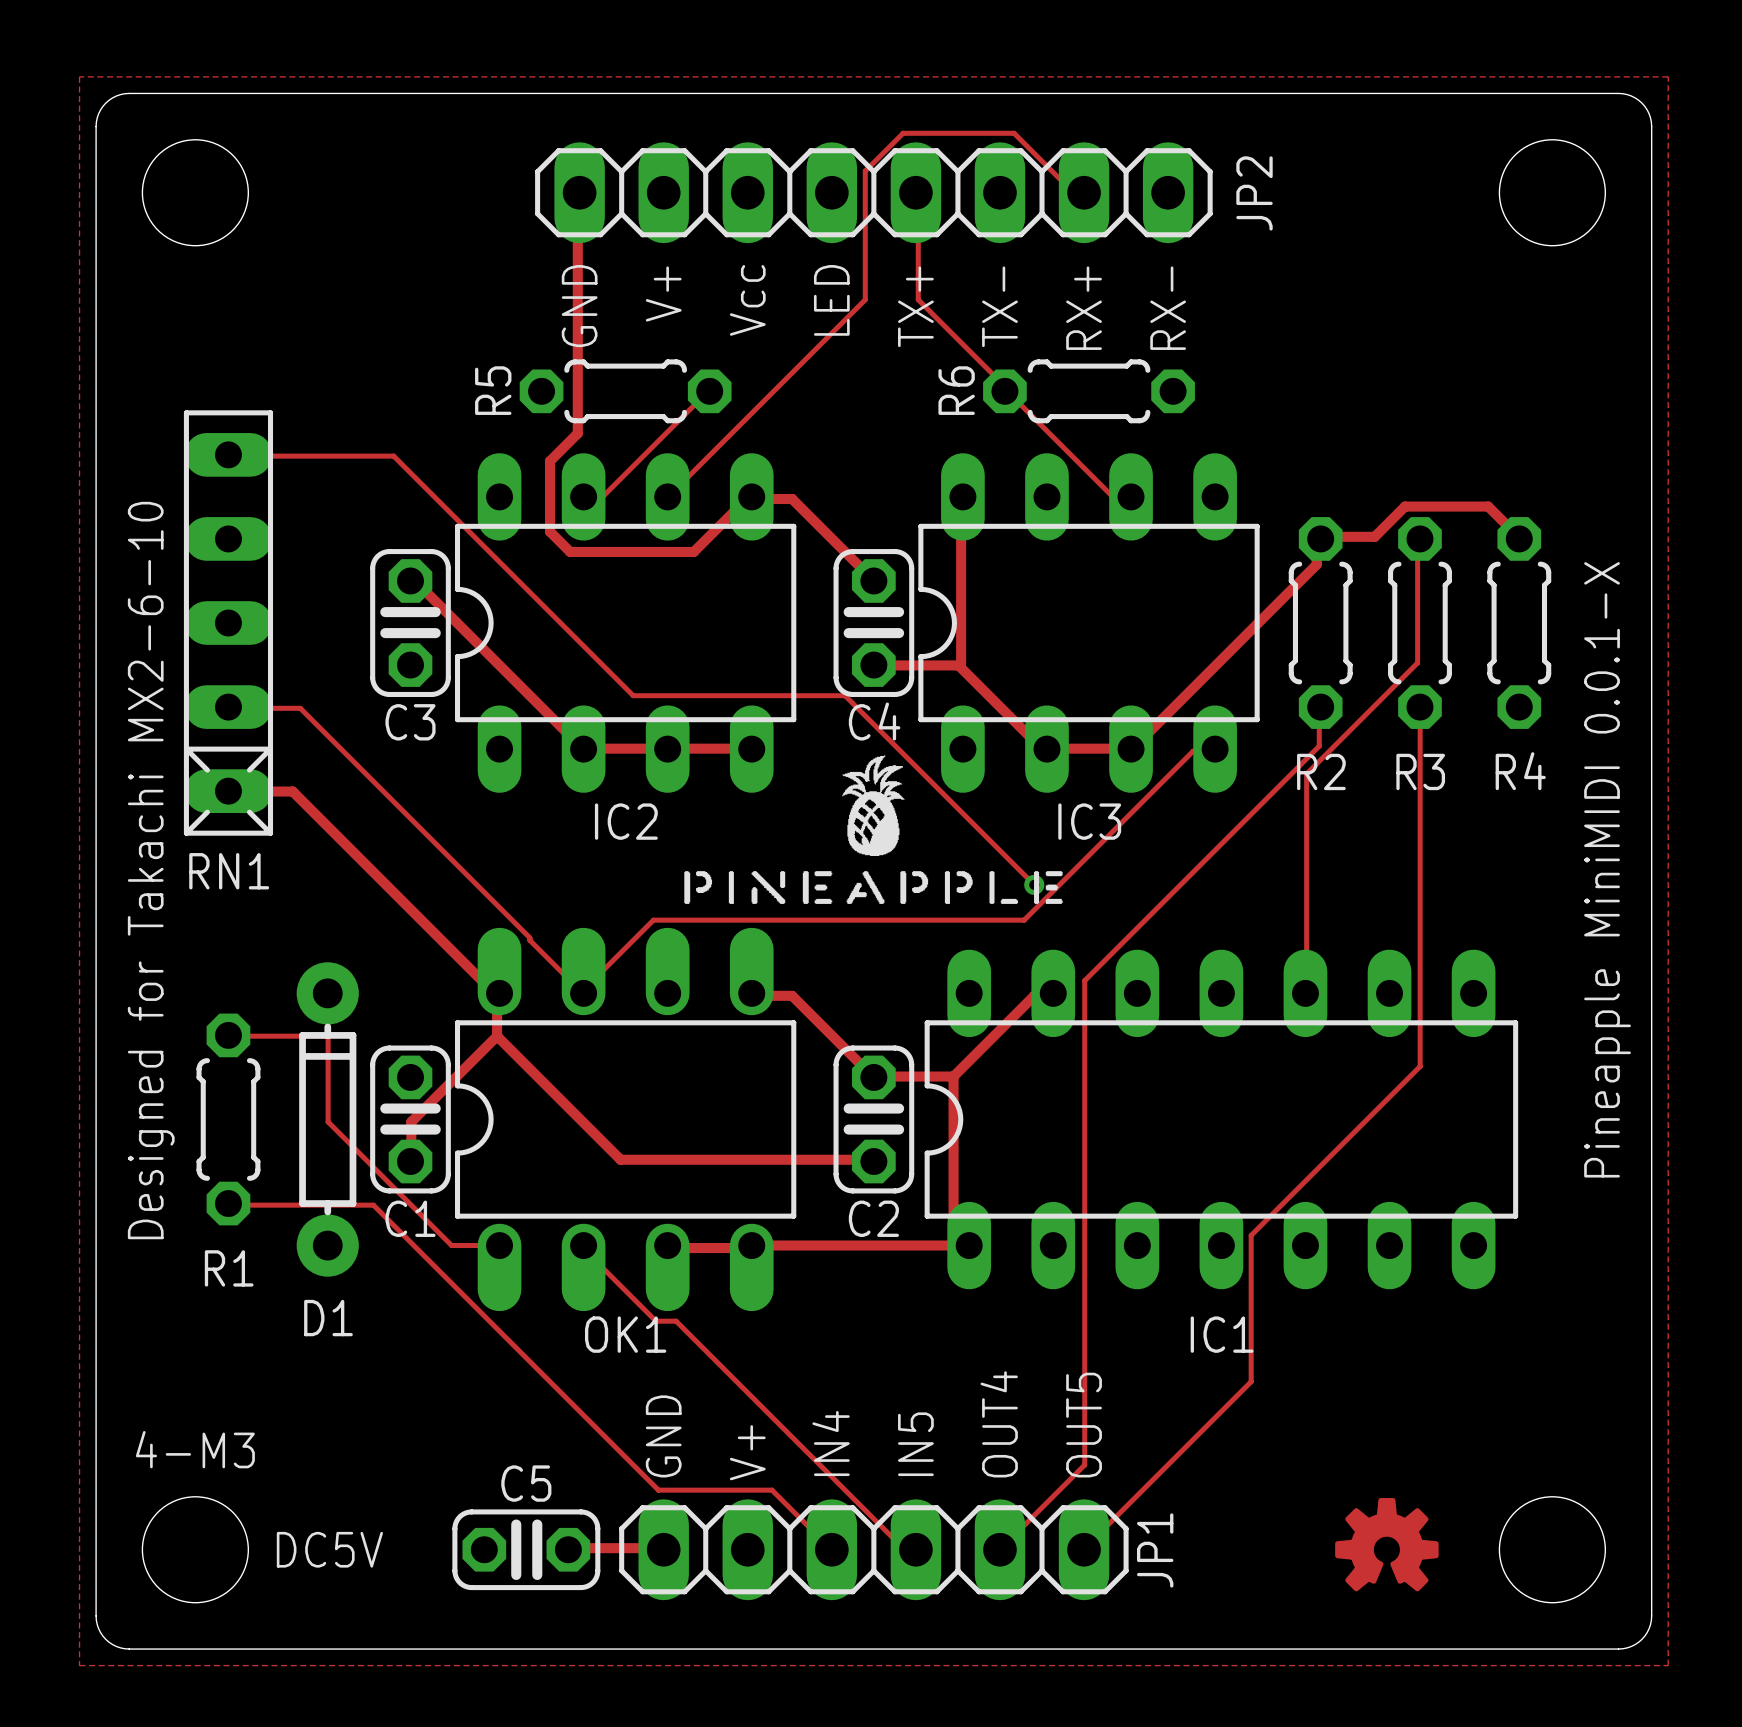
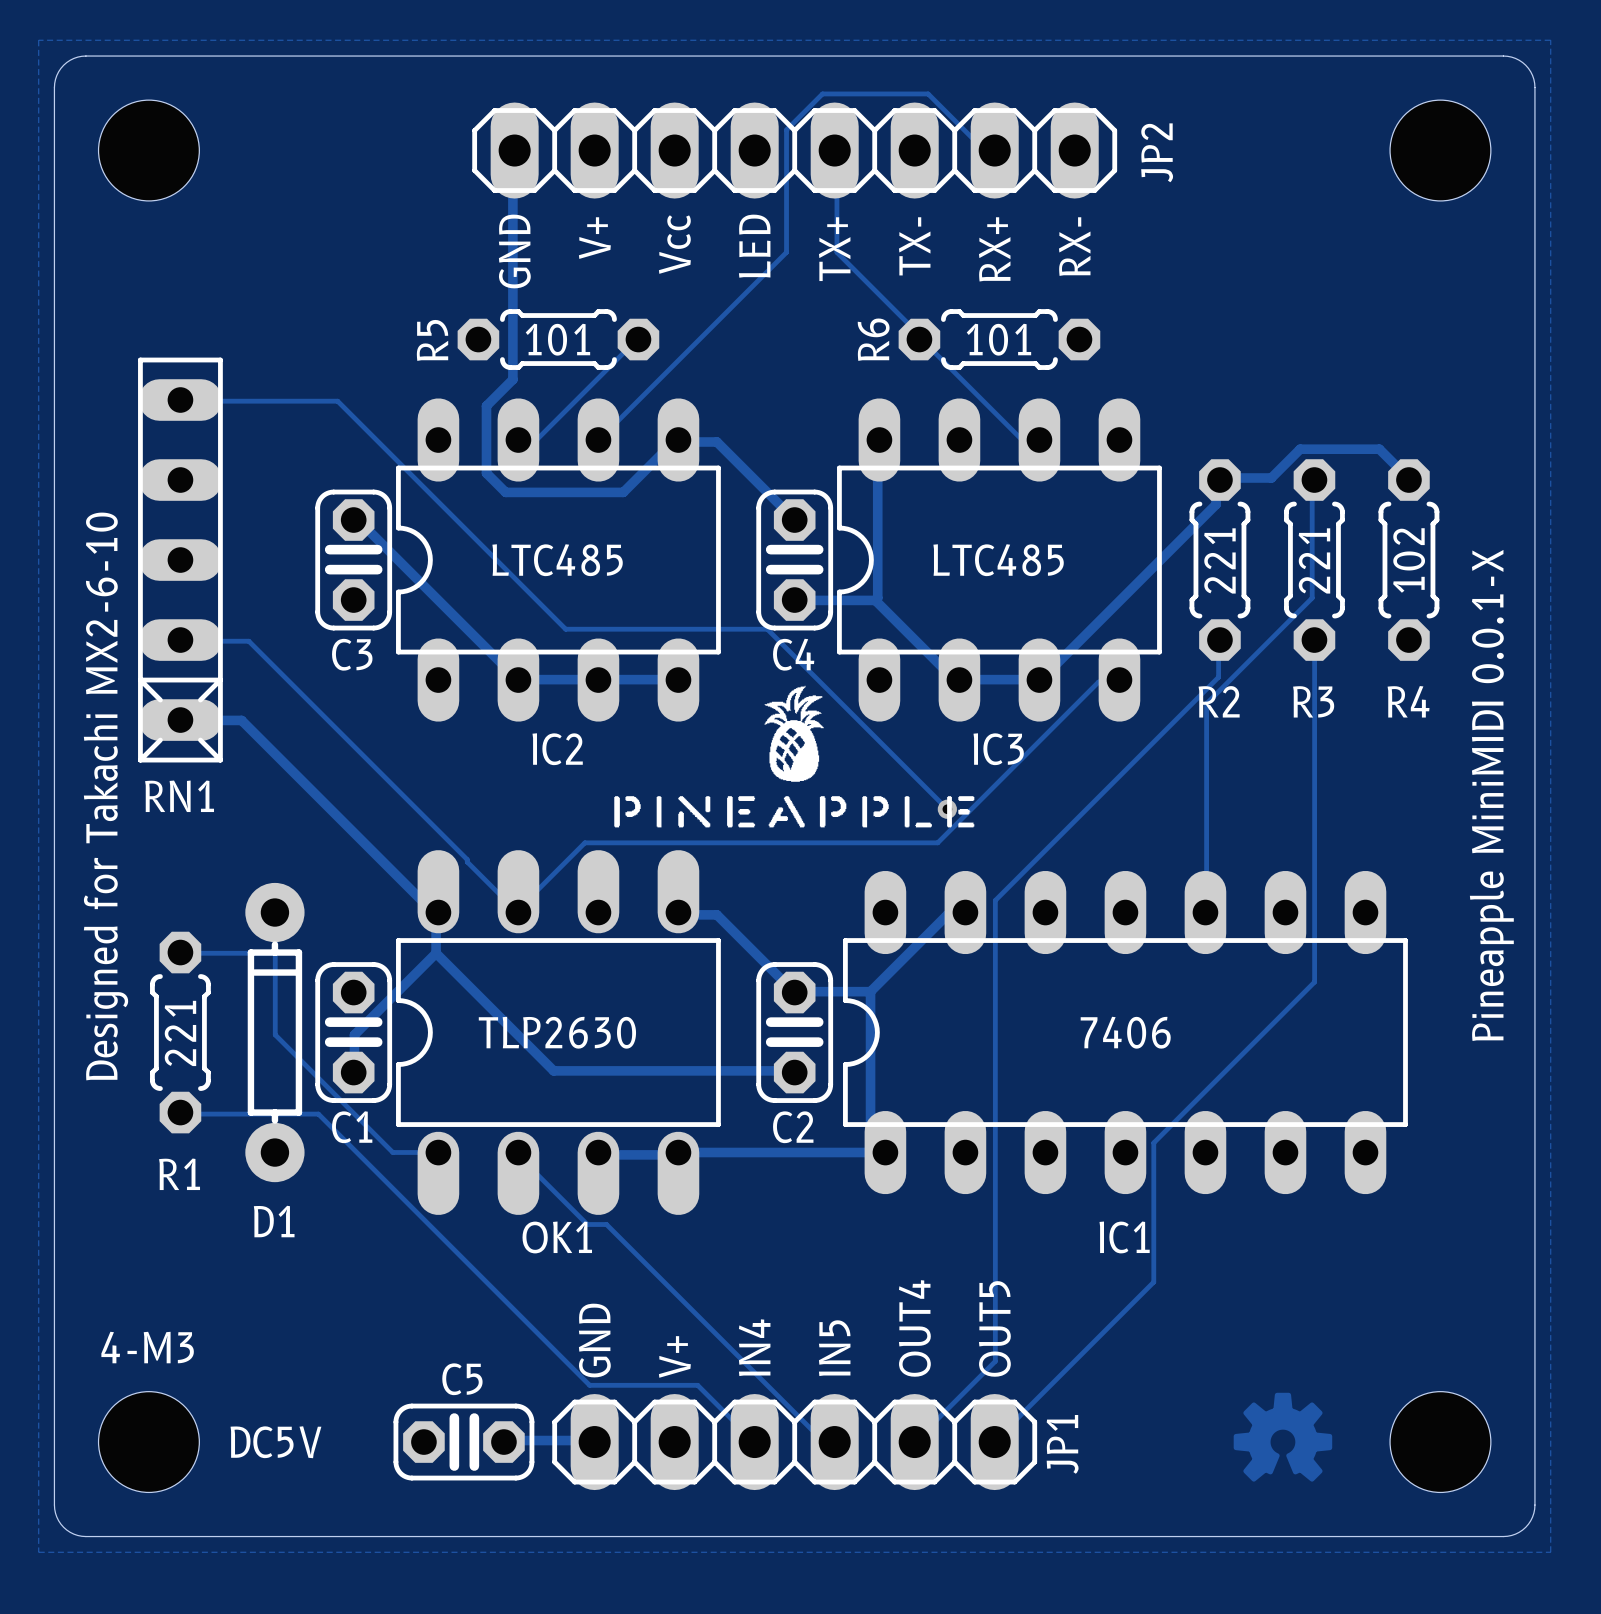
text: none -> 101 (557, 339)
text: none -> 101 (998, 339)
text: none -> LTC485 (557, 560)
text: none -> LTC485 (998, 560)
text: none -> 221 (1219, 560)
text: none -> 221 (1314, 560)
text: none -> 102 (1409, 560)
text: none -> 7406 (1125, 1032)
text: none -> TLP2630 (557, 1032)
text: none -> 221 (180, 1033)

